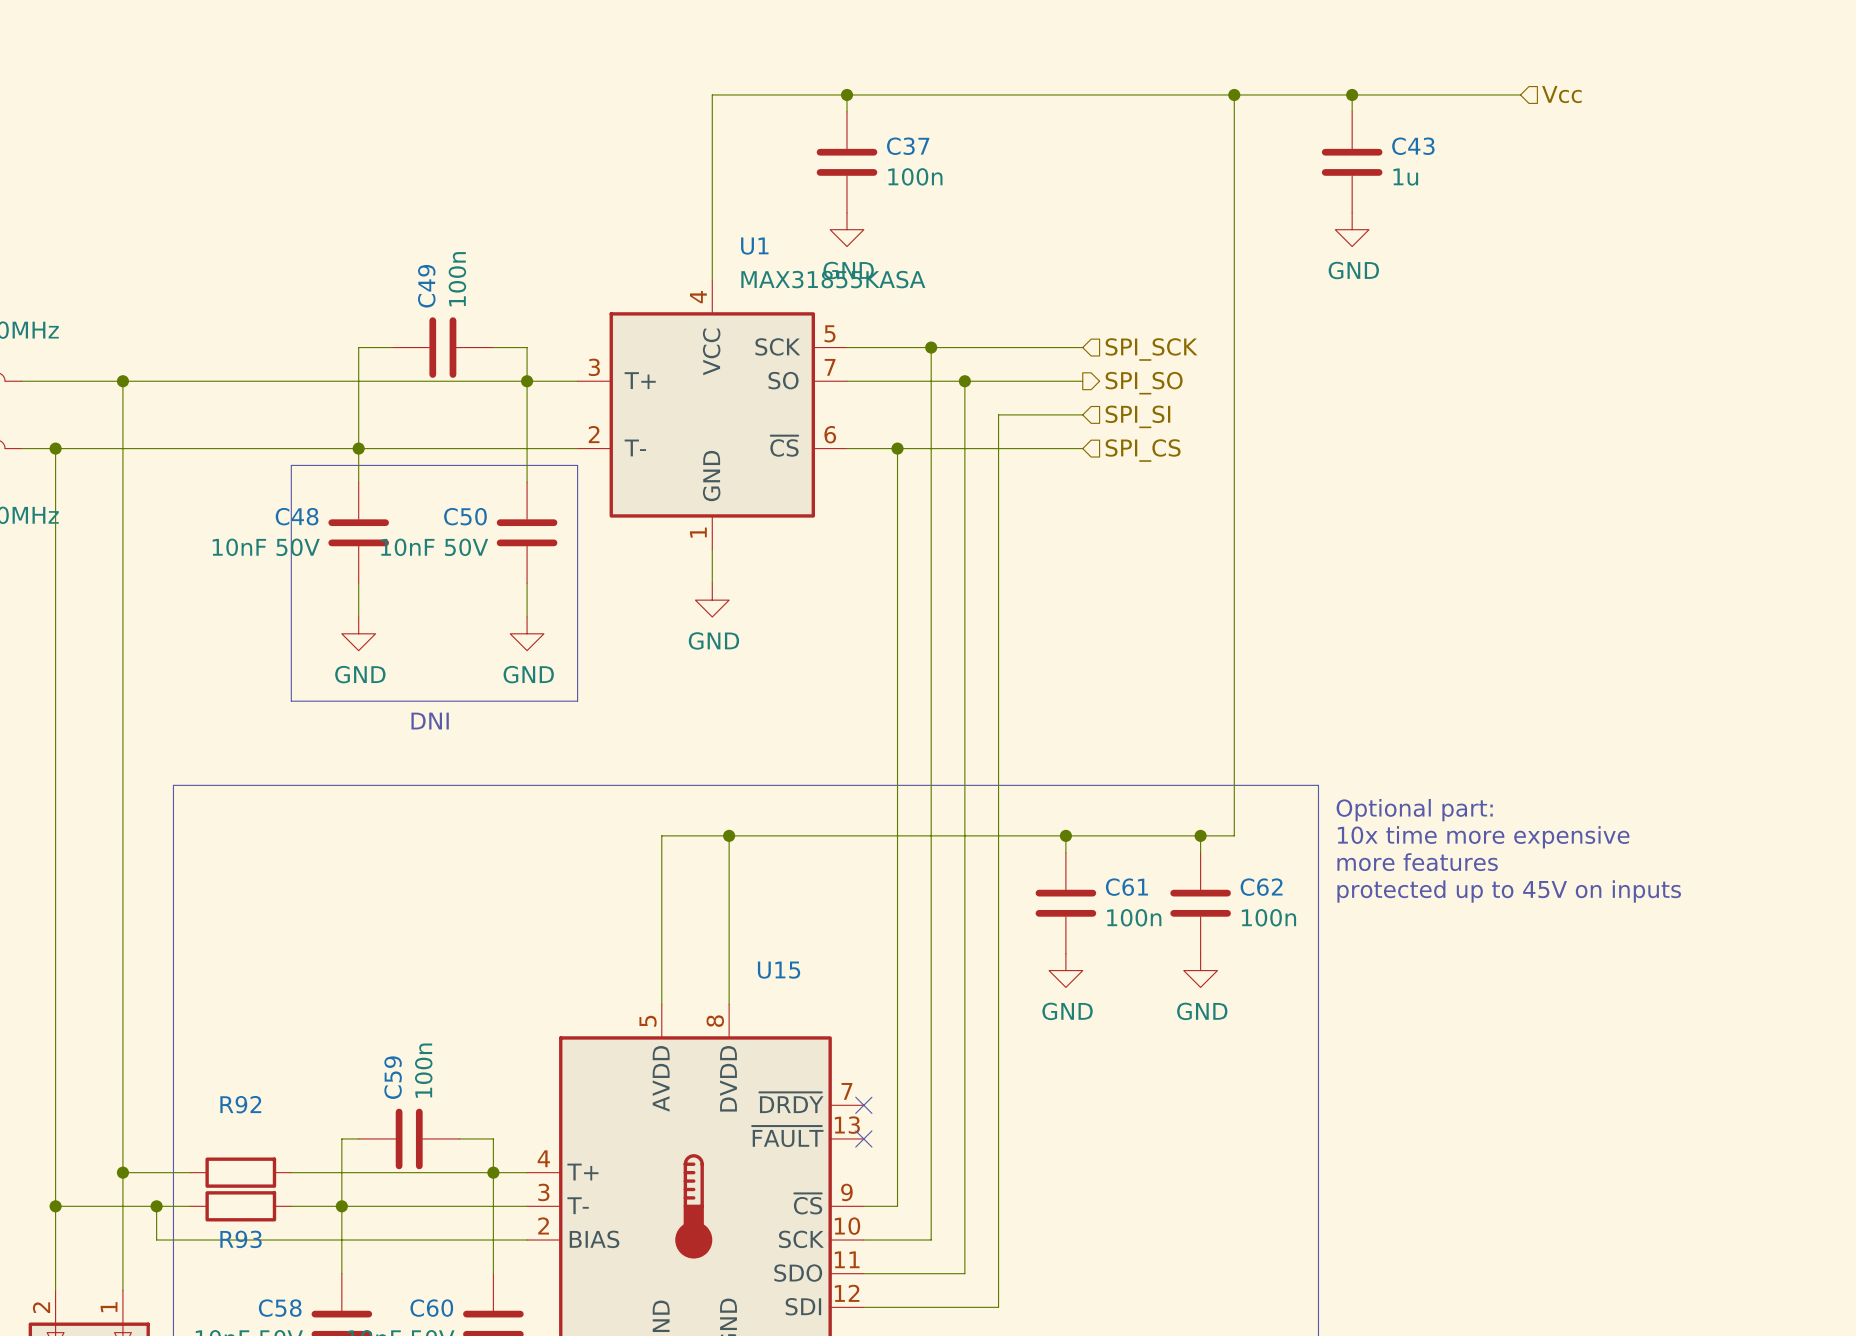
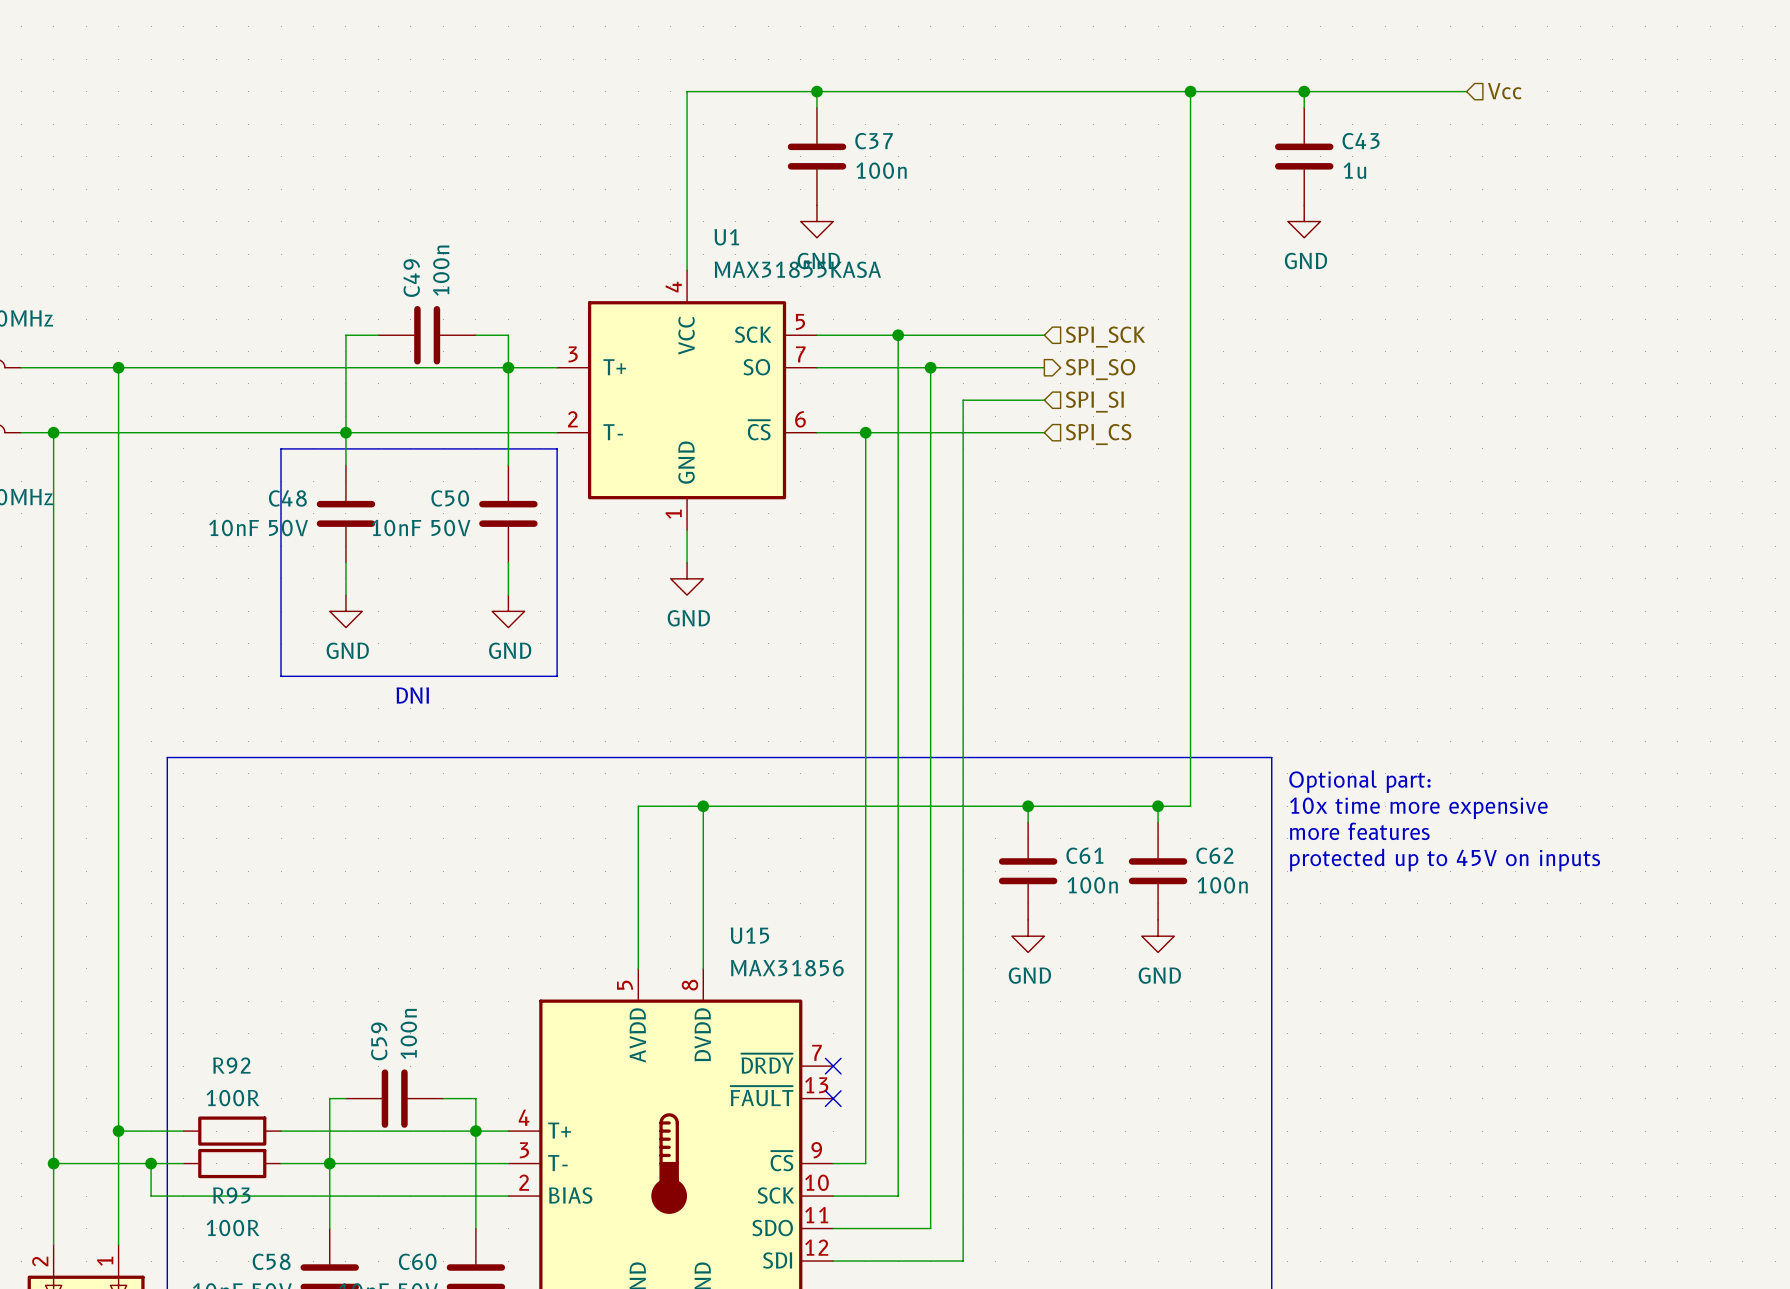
U15 value: none -> MAX31856 (787, 968)
R92 value: none -> 100R (232, 1098)
R93 value: none -> 100R (232, 1228)

